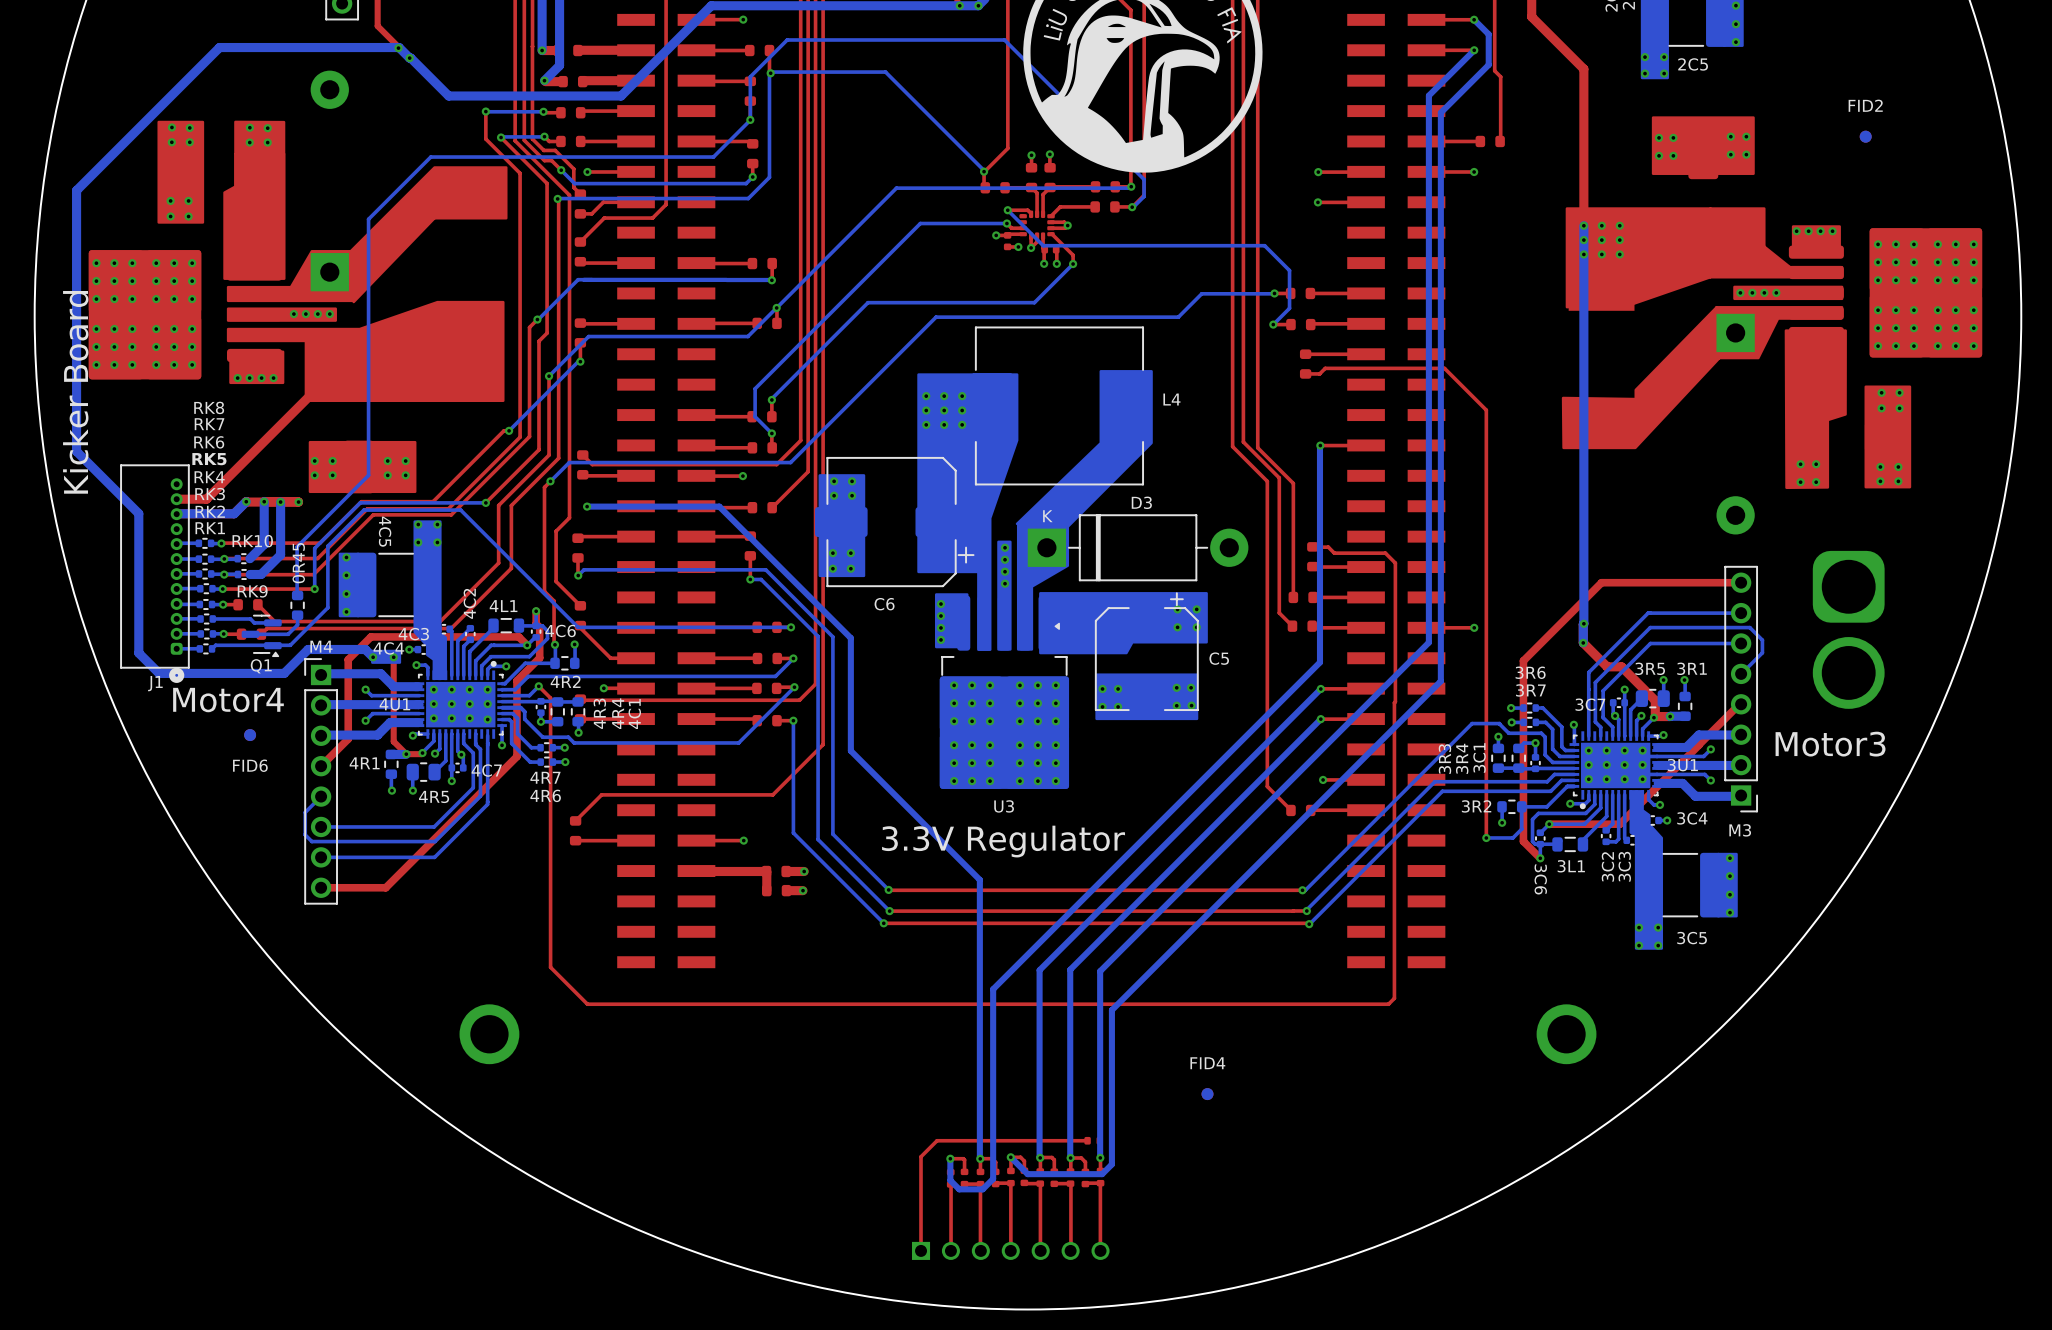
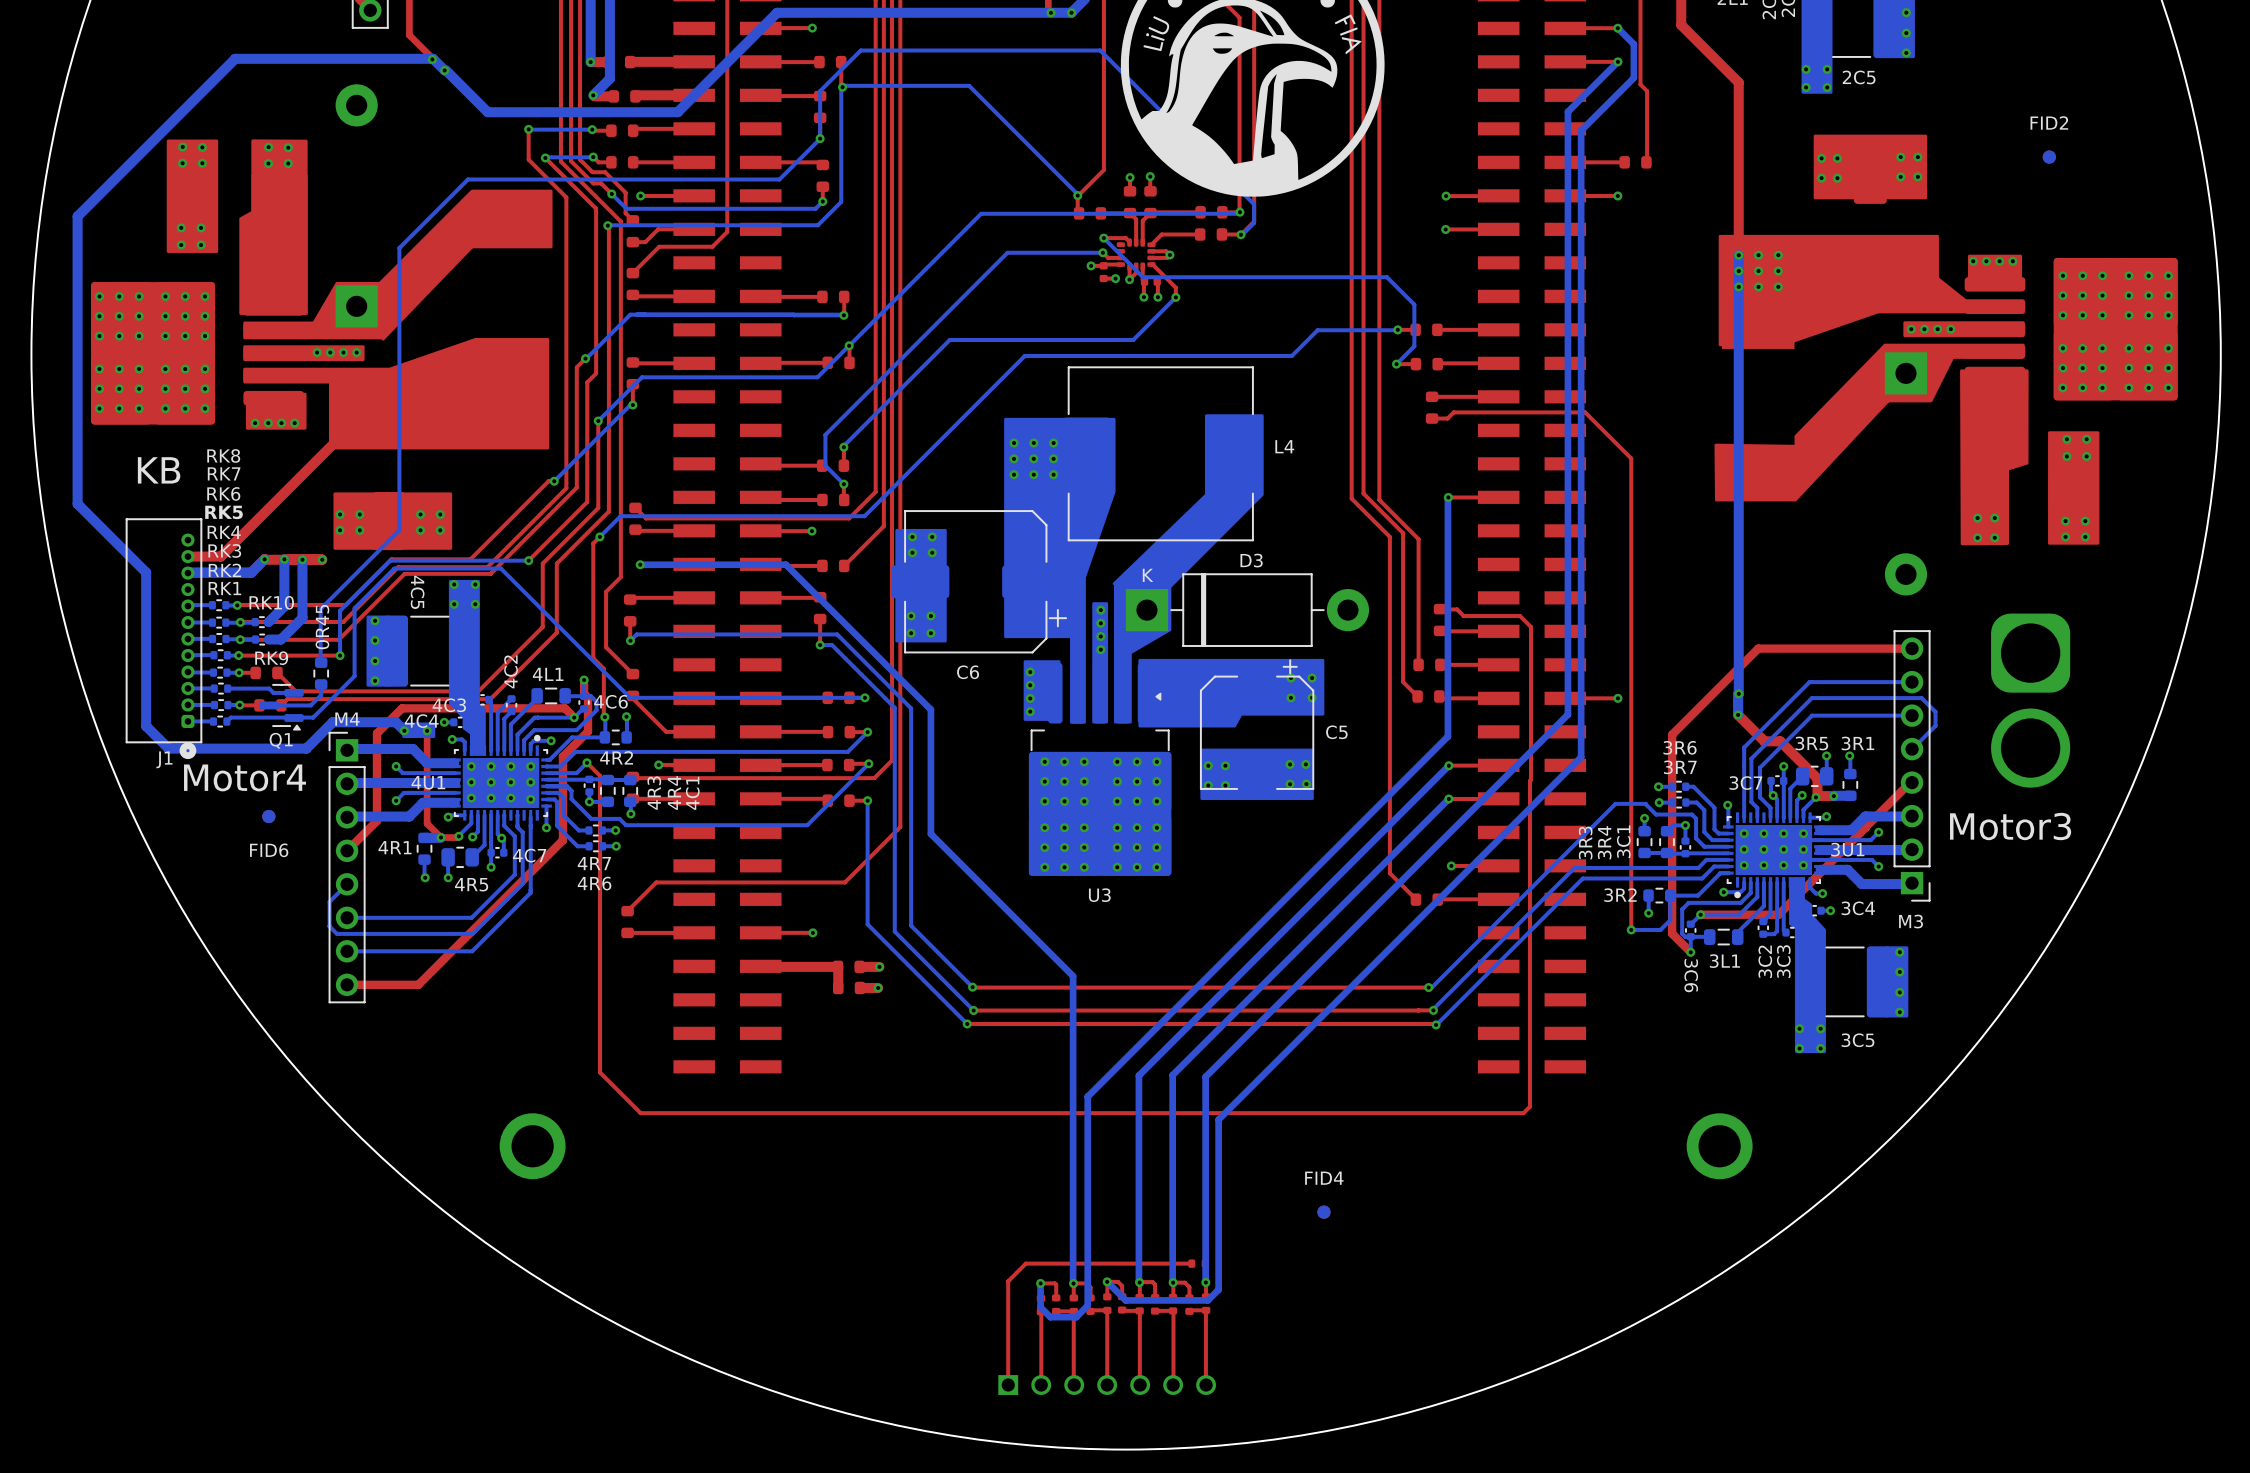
text: Kicker Board (75, 392) -> none
text: none -> KB (159, 470)
text: 3.3V Regulator (1003, 841) -> none

